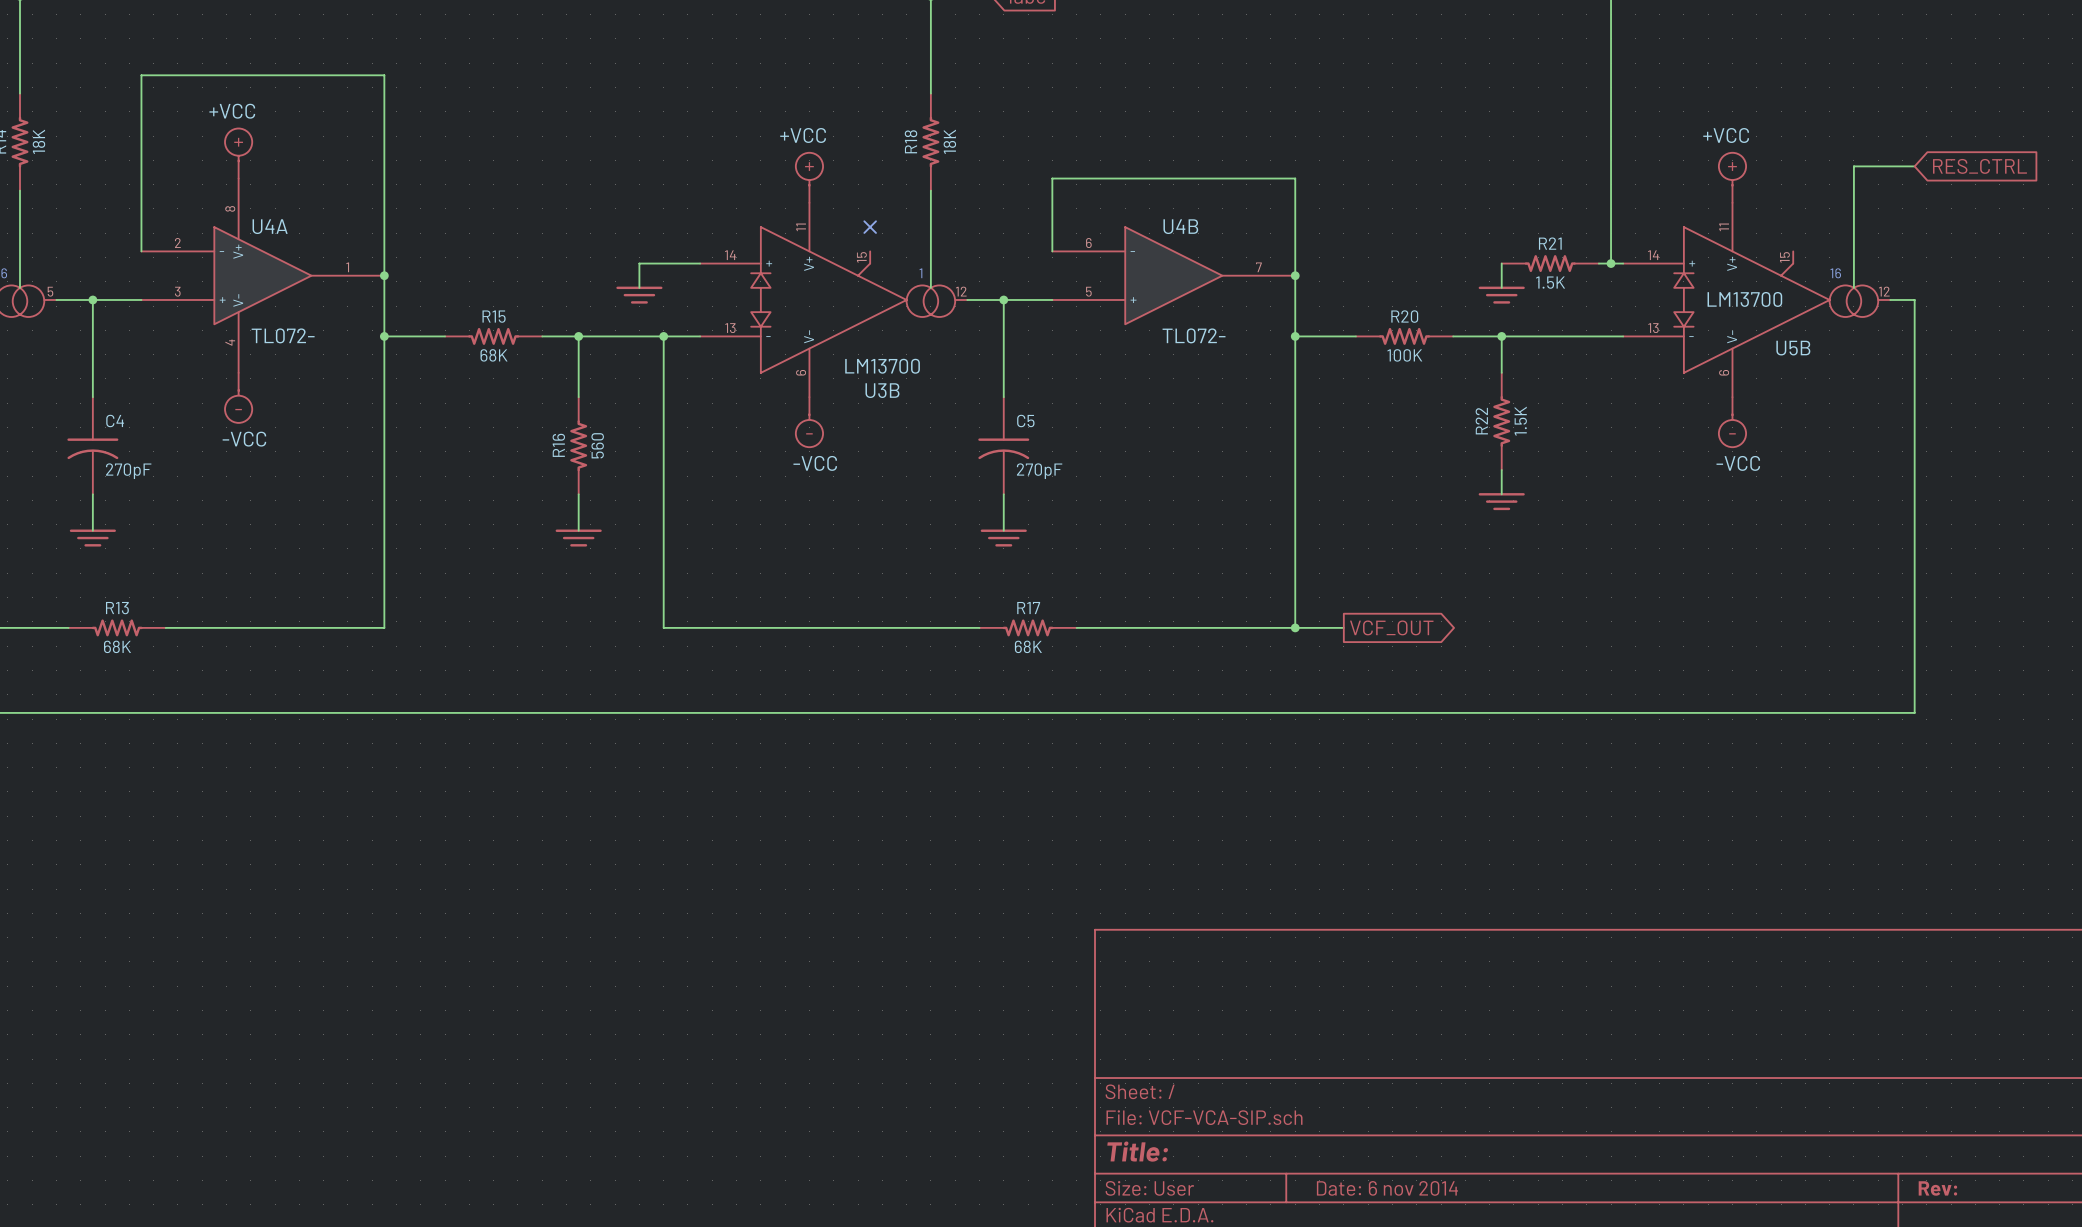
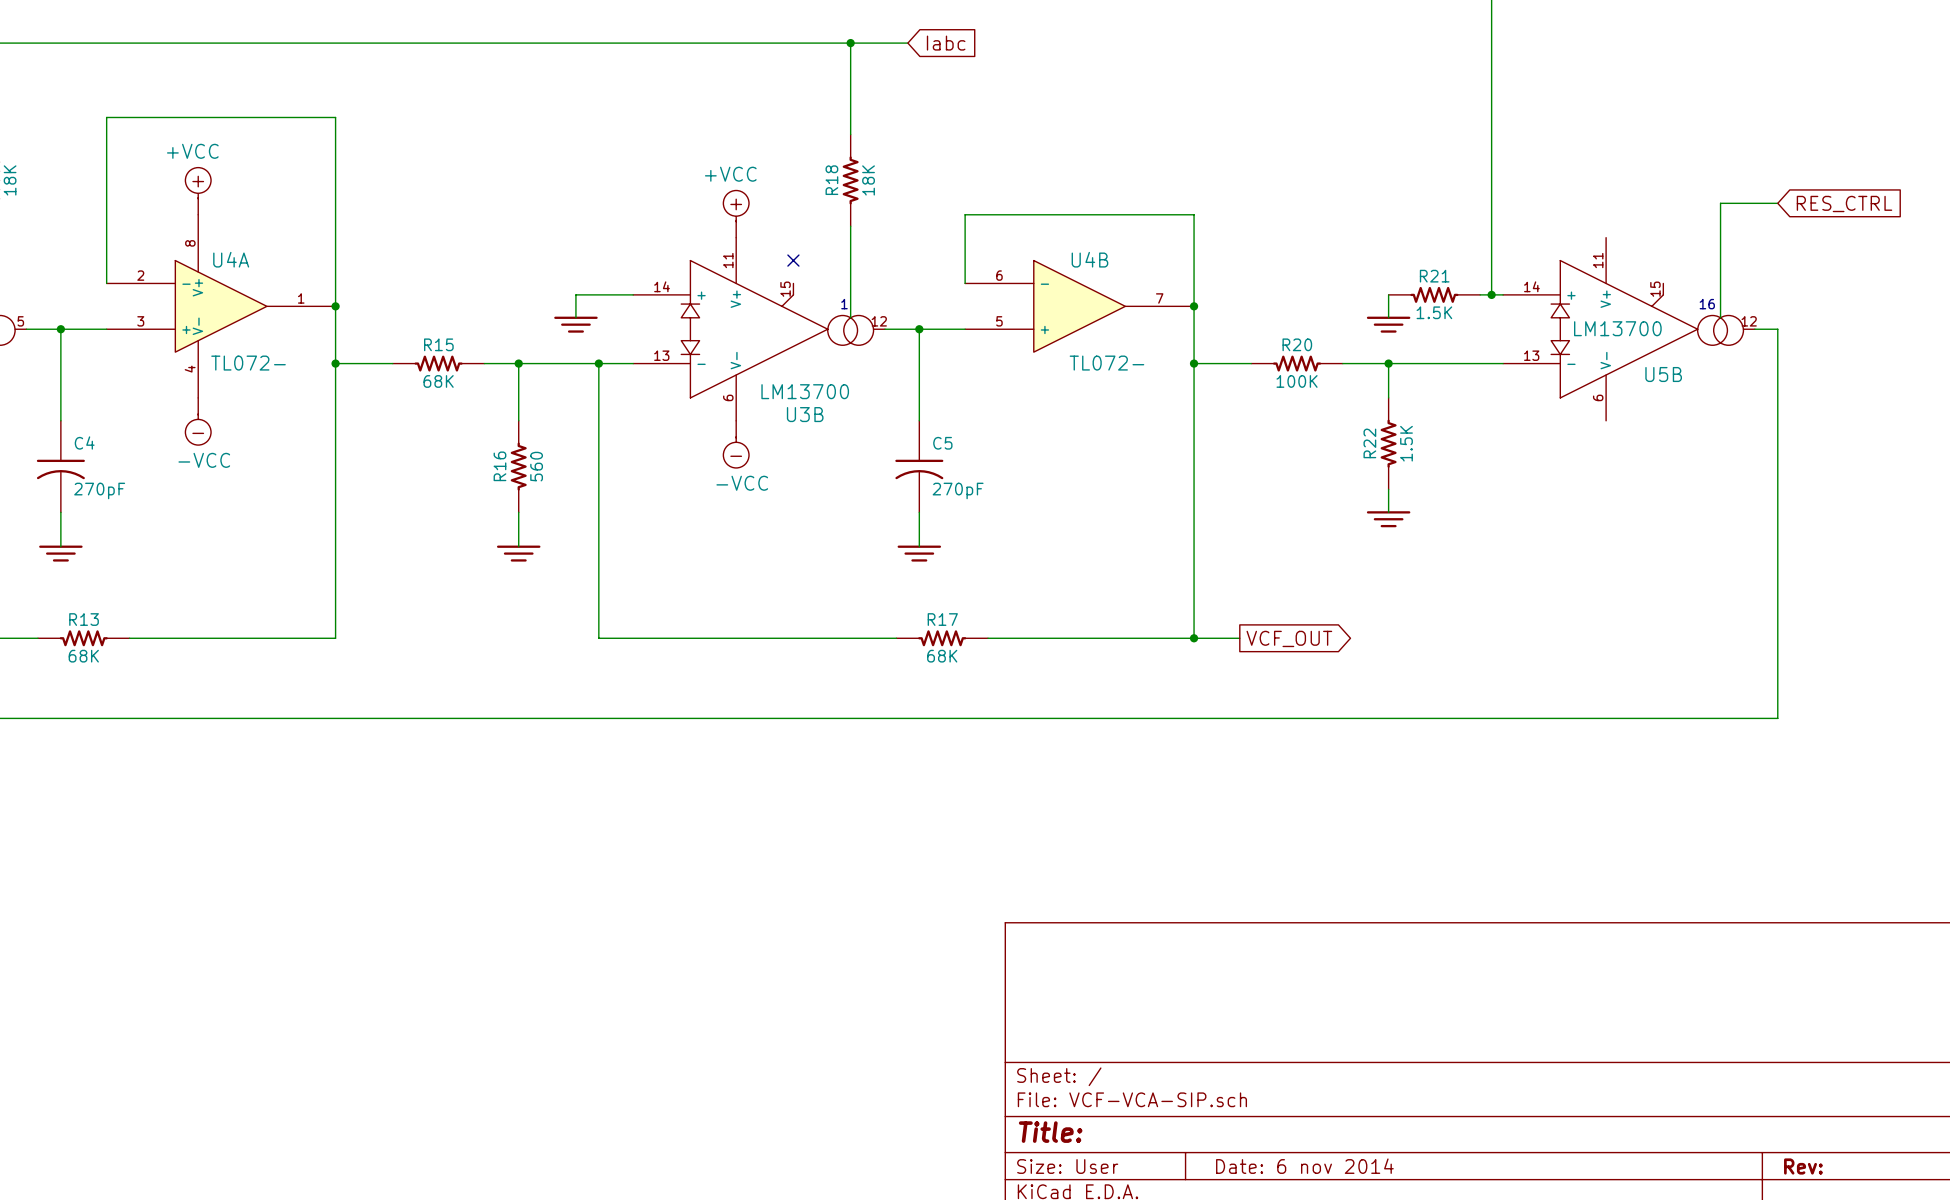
power symbol: +VCC (1732, 177) -> none
power symbol: -VCC (1732, 422) -> none

